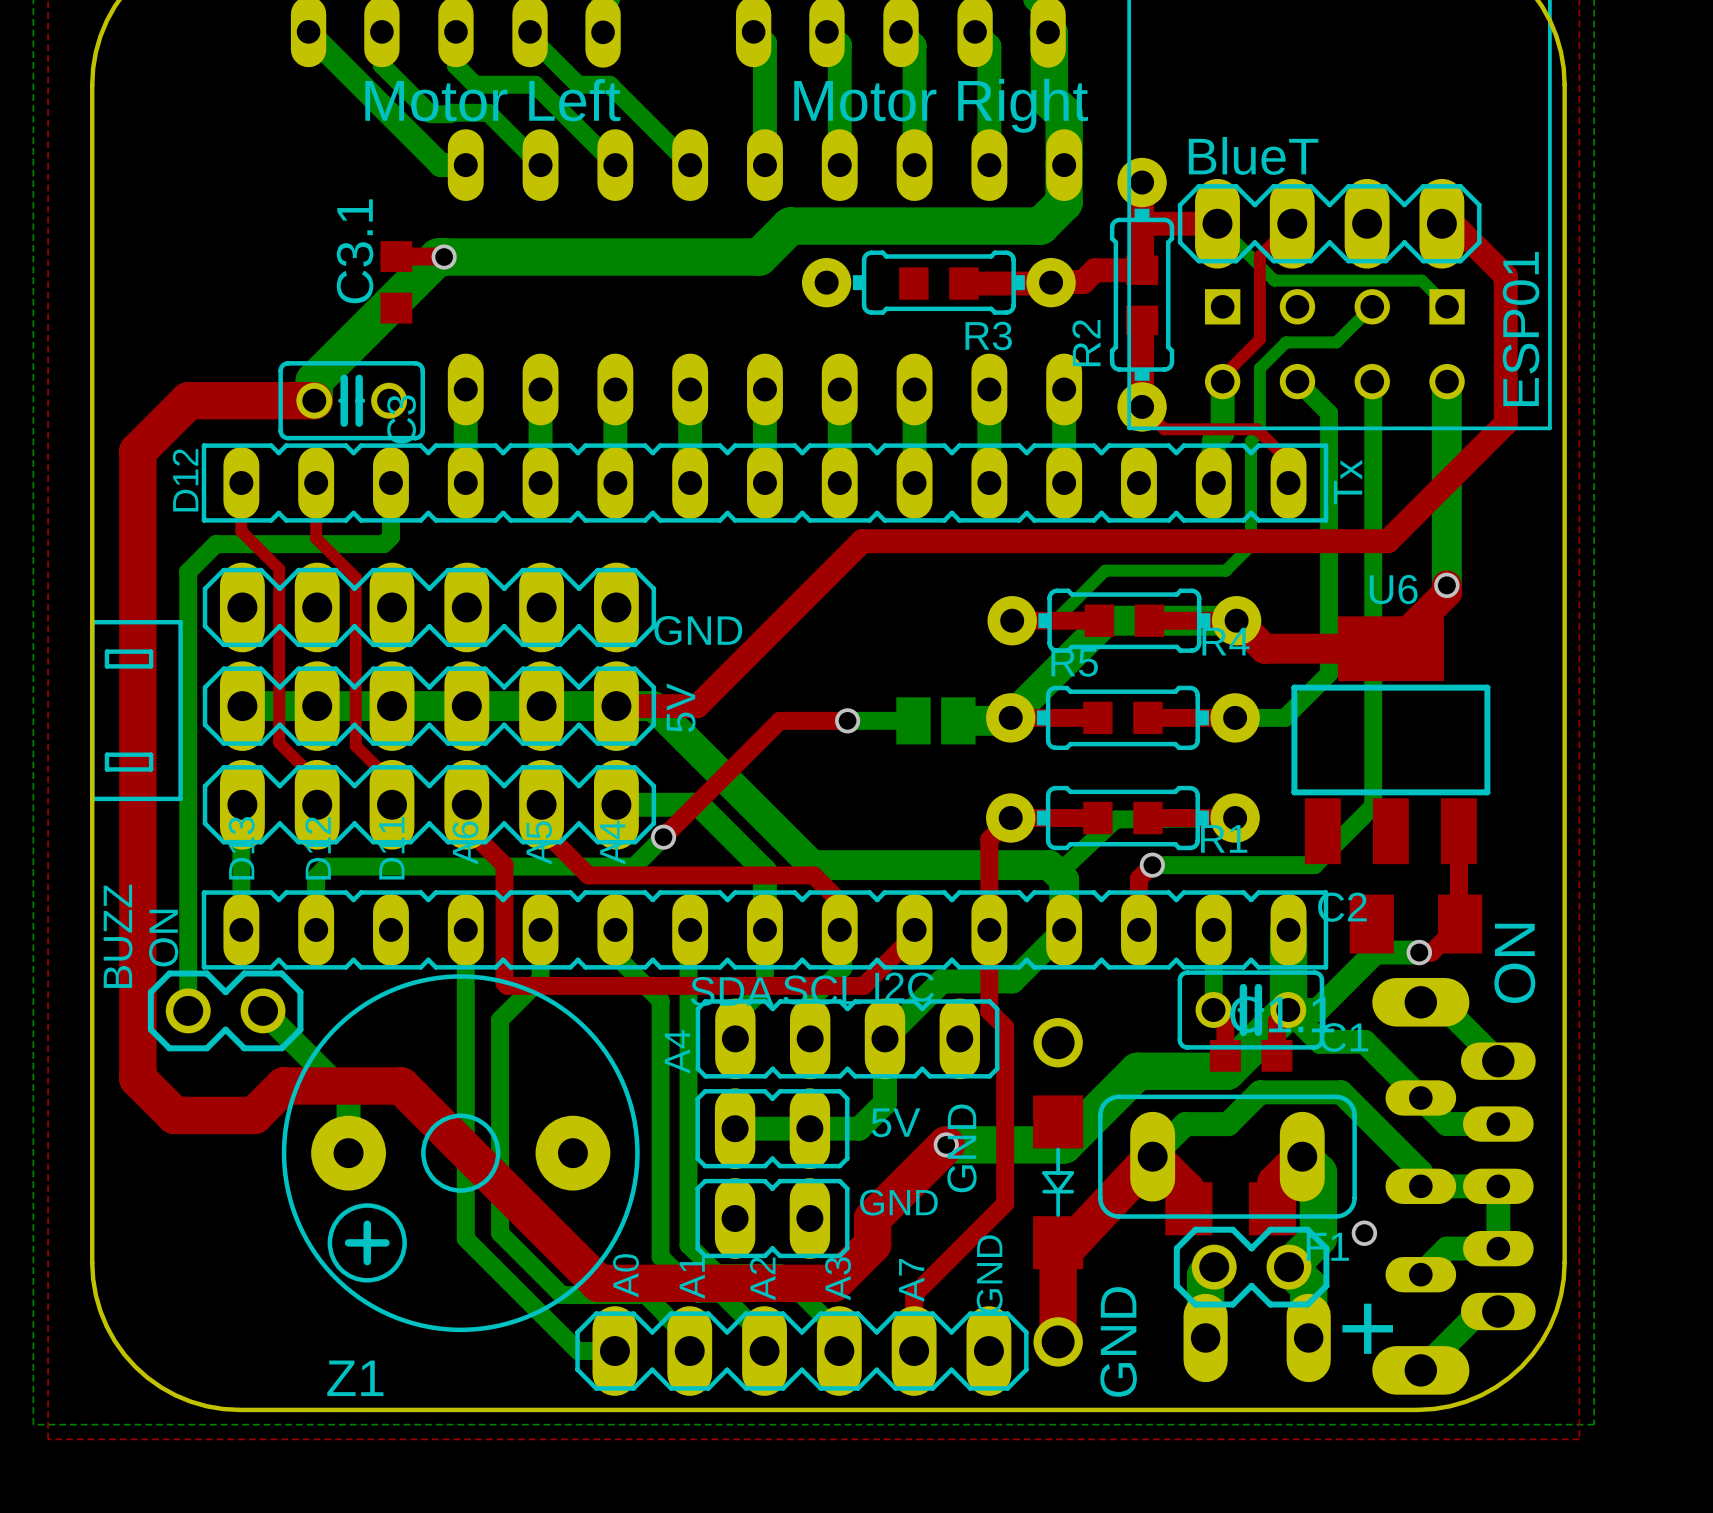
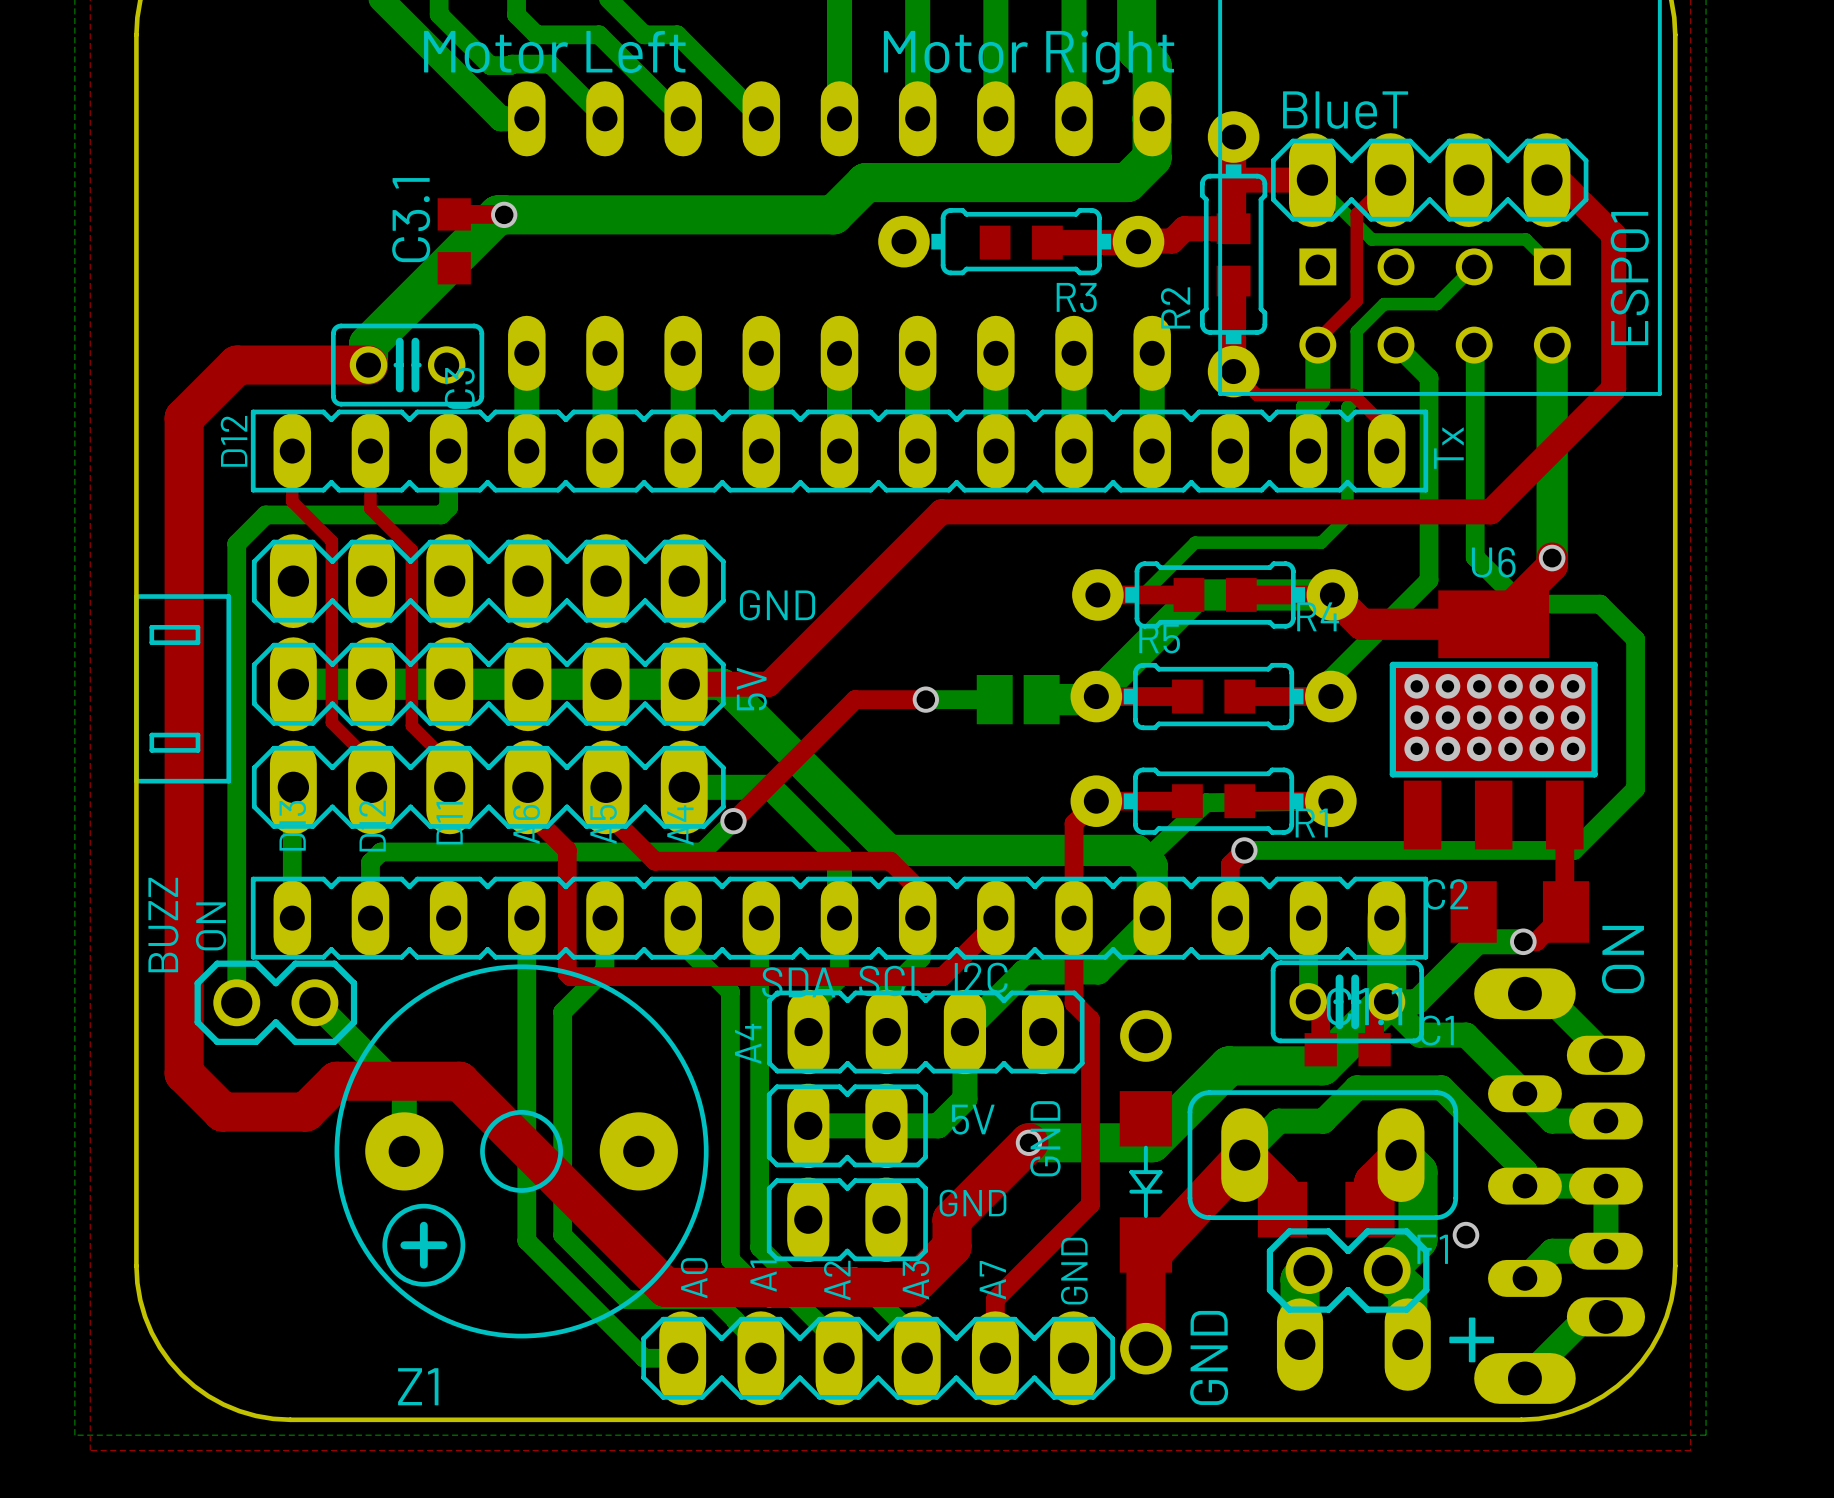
bottom track: (1373, 584) (1373, 806) (1314, 865) -> (1475, 557) (1522, 604) (1600, 604) (1635, 639) (1635, 788) (1574, 850) (1413, 850)
bottom track: (1329, 606) (1329, 673) (1284, 717) (1235, 717) -> (1429, 580) (1330, 678) (1330, 696)
U6 footprint: [1291, 616, 1491, 865] -> [1389, 590, 1598, 850]
via: none -> (1416, 686)
via: none -> (1447, 686)
via: none -> (1479, 686)
via: none -> (1510, 686)
via: none -> (1541, 686)
via: none -> (1573, 686)
via: none -> (1416, 717)
via: none -> (1447, 717)
via: none -> (1479, 717)
via: none -> (1510, 717)
via: none -> (1541, 717)
via: none -> (1573, 717)
via: none -> (1416, 748)
via: none -> (1447, 748)
via: none -> (1479, 748)
via: none -> (1510, 748)
via: none -> (1541, 748)
via: none -> (1573, 748)

